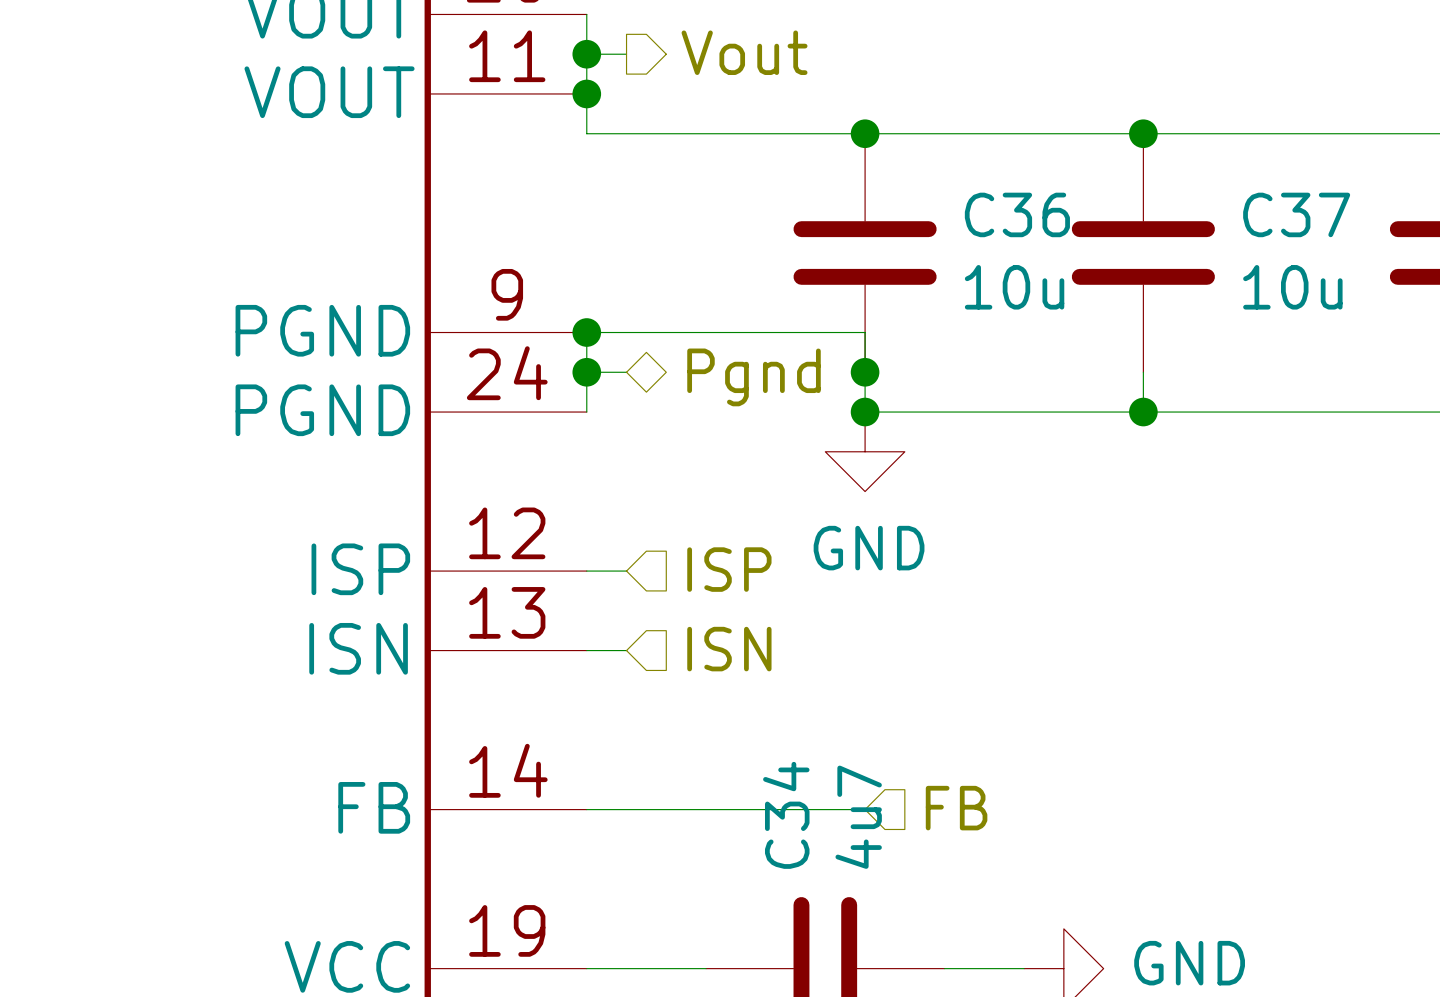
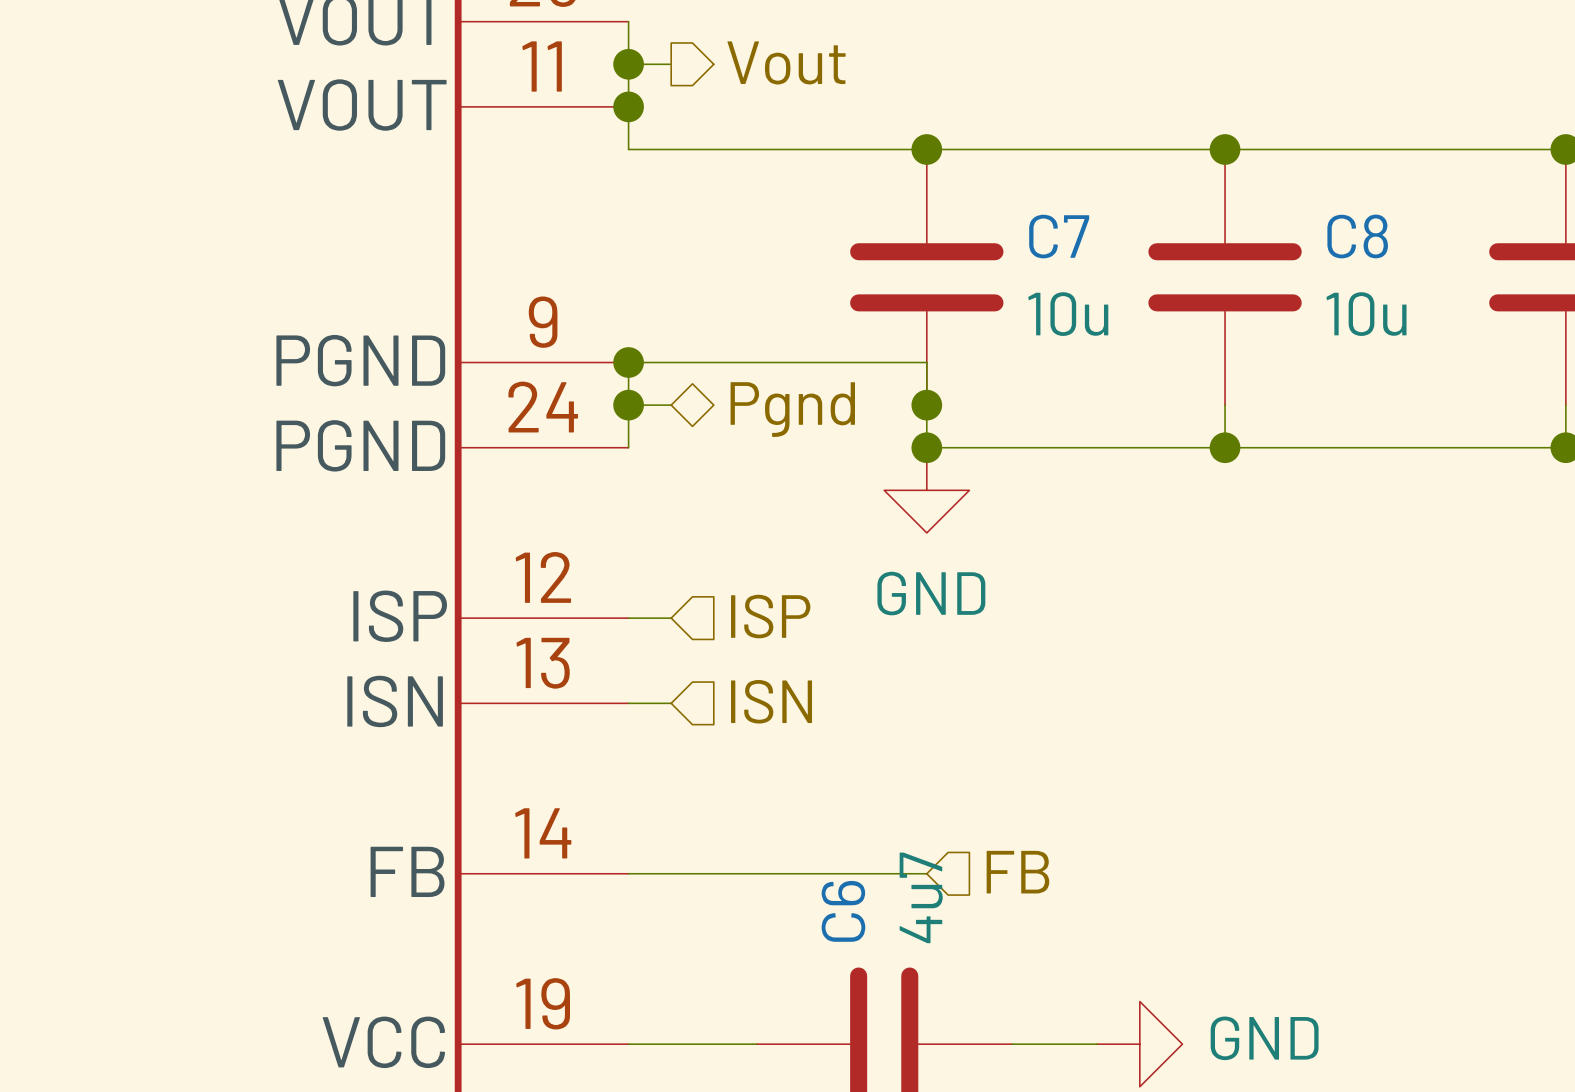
C36 name: C36 (1017, 214) -> C7 (1059, 236)
C37 name: C37 (1296, 214) -> C8 (1357, 236)
C34 name: C34 (786, 815) -> C6 (843, 911)

